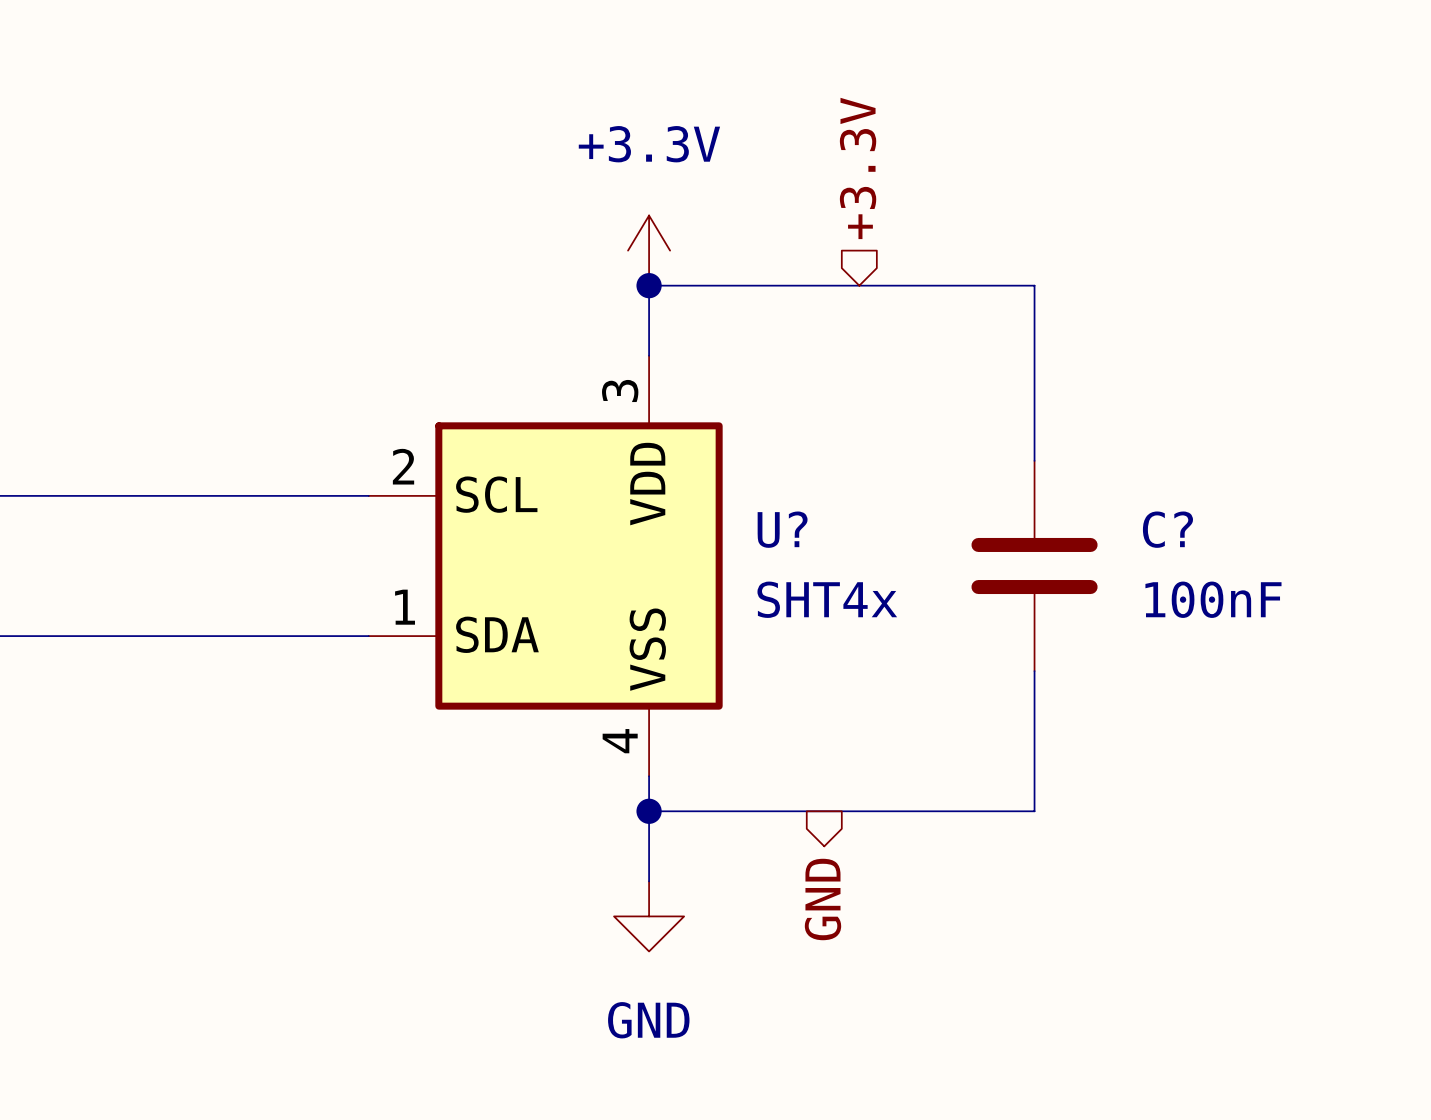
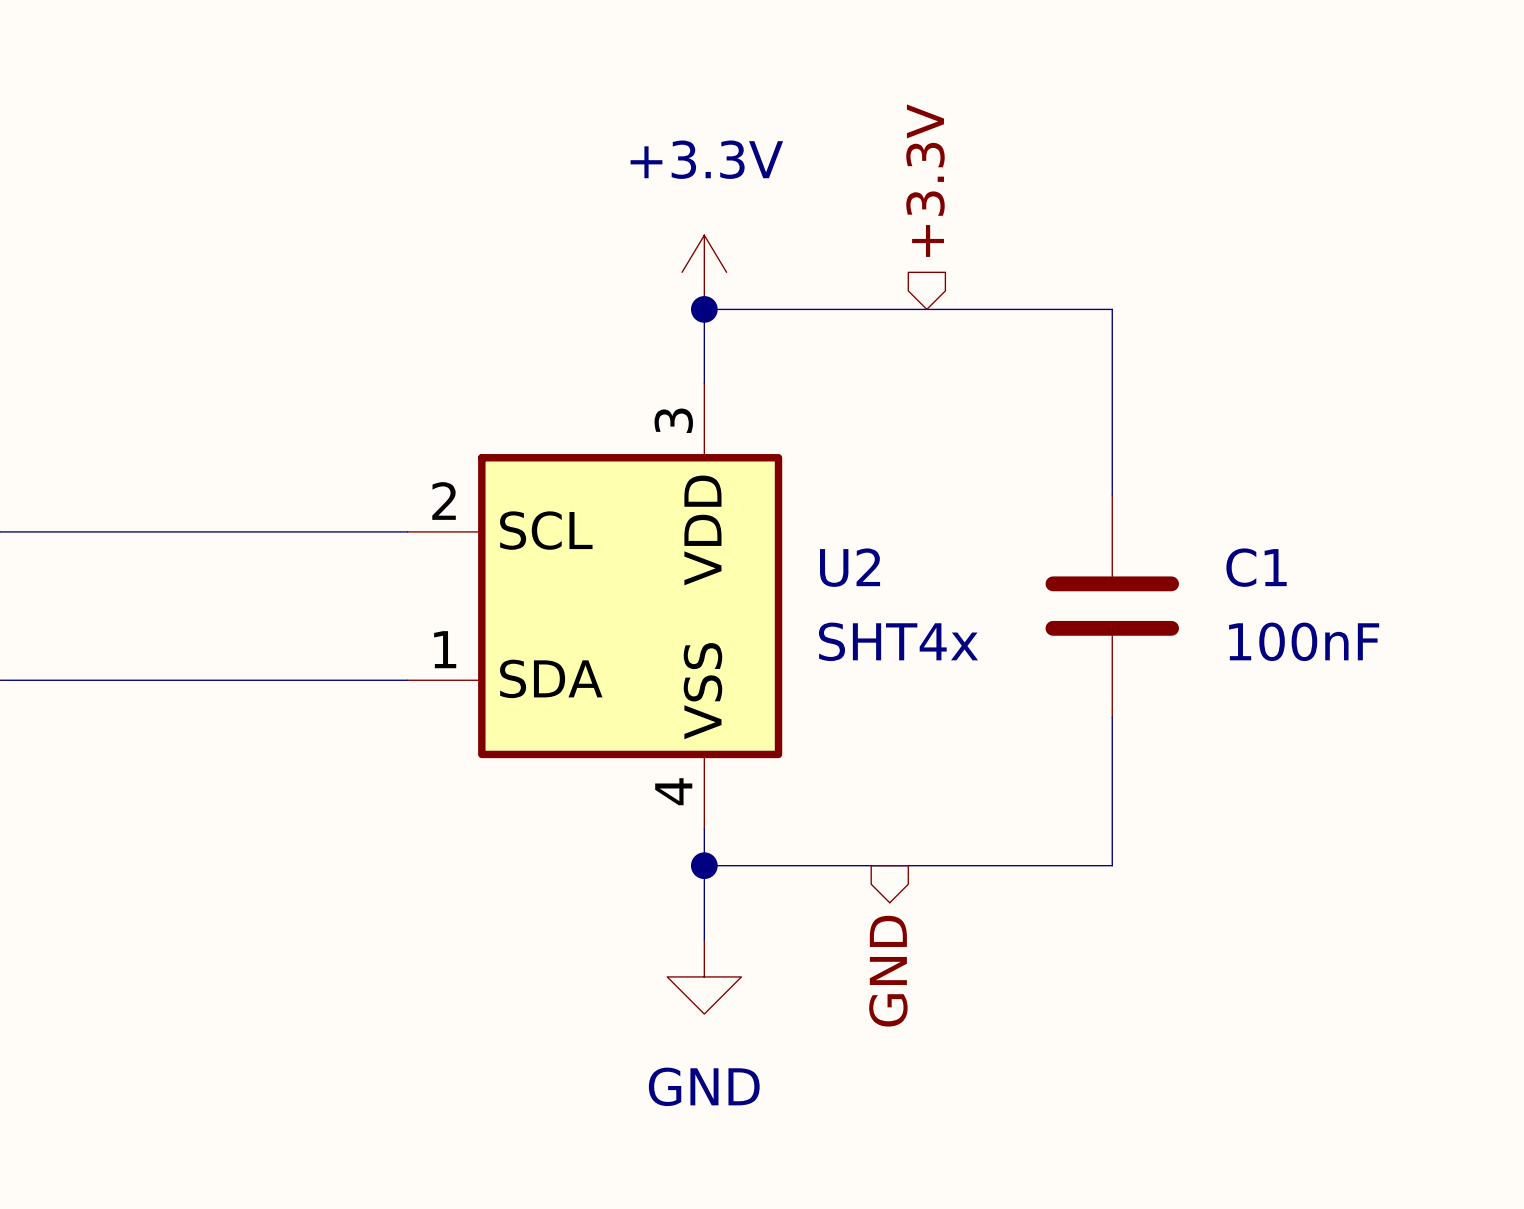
U? name: U? (782, 529) -> U2 (850, 567)
C? name: C? (1167, 529) -> C1 (1256, 567)

